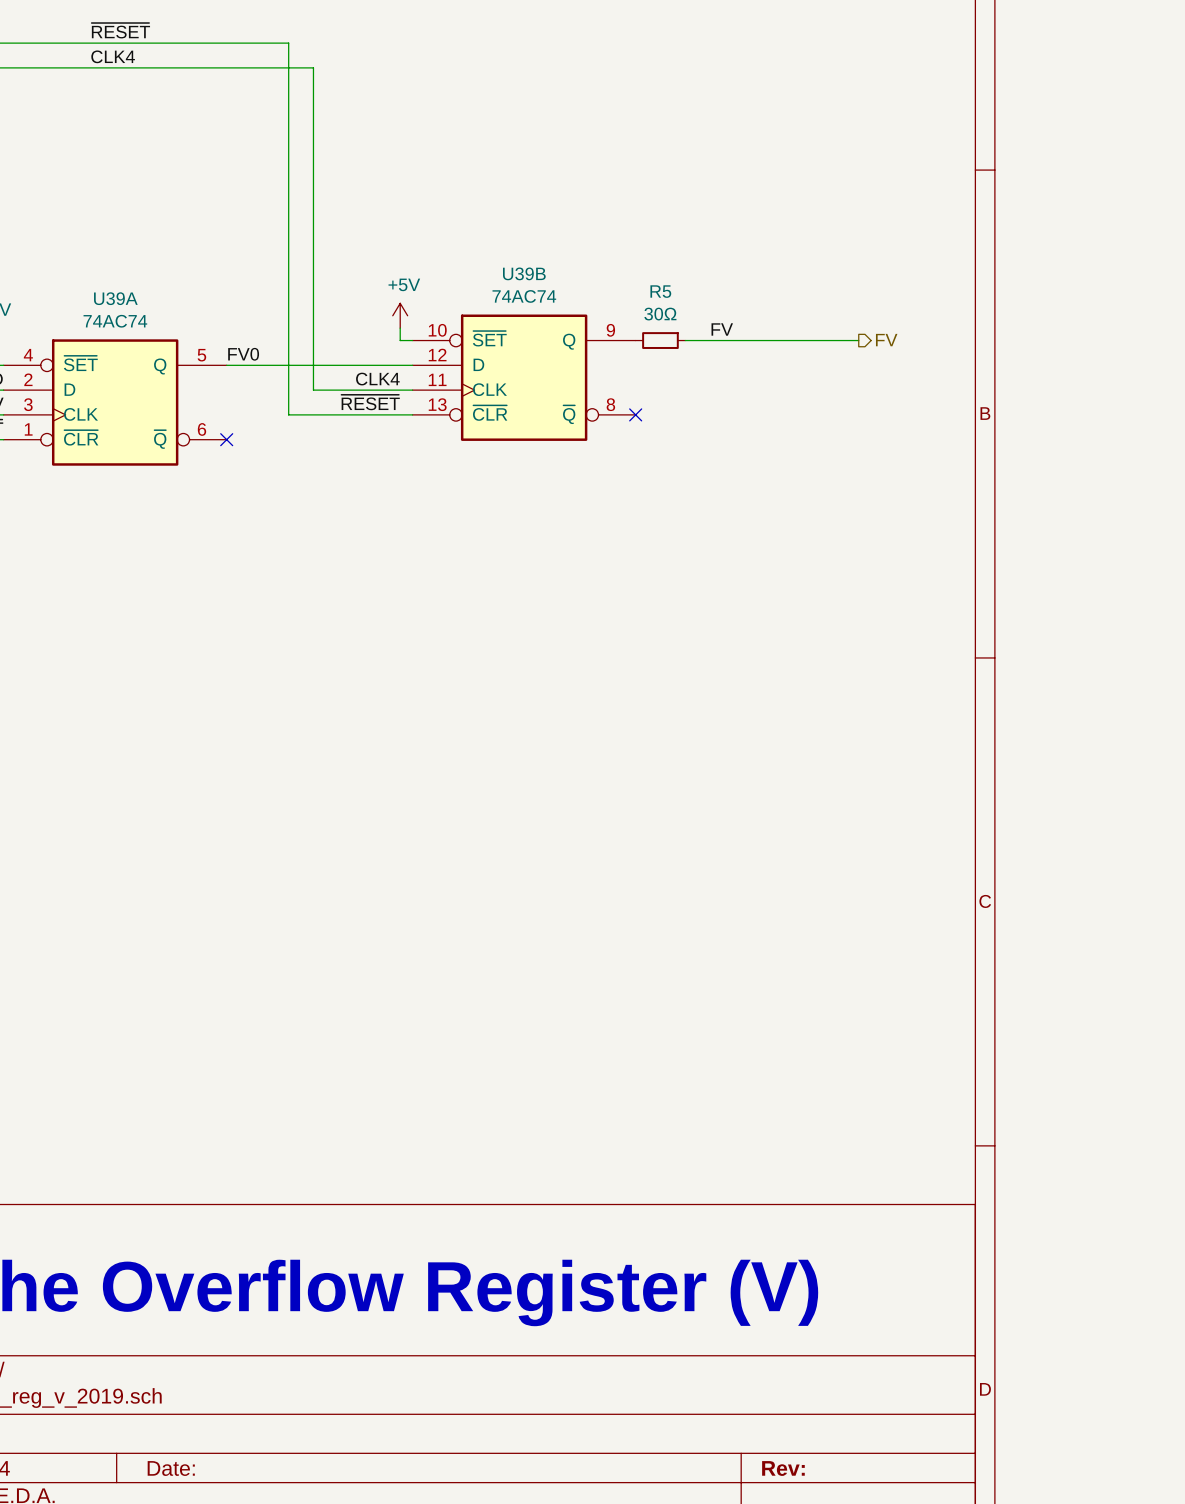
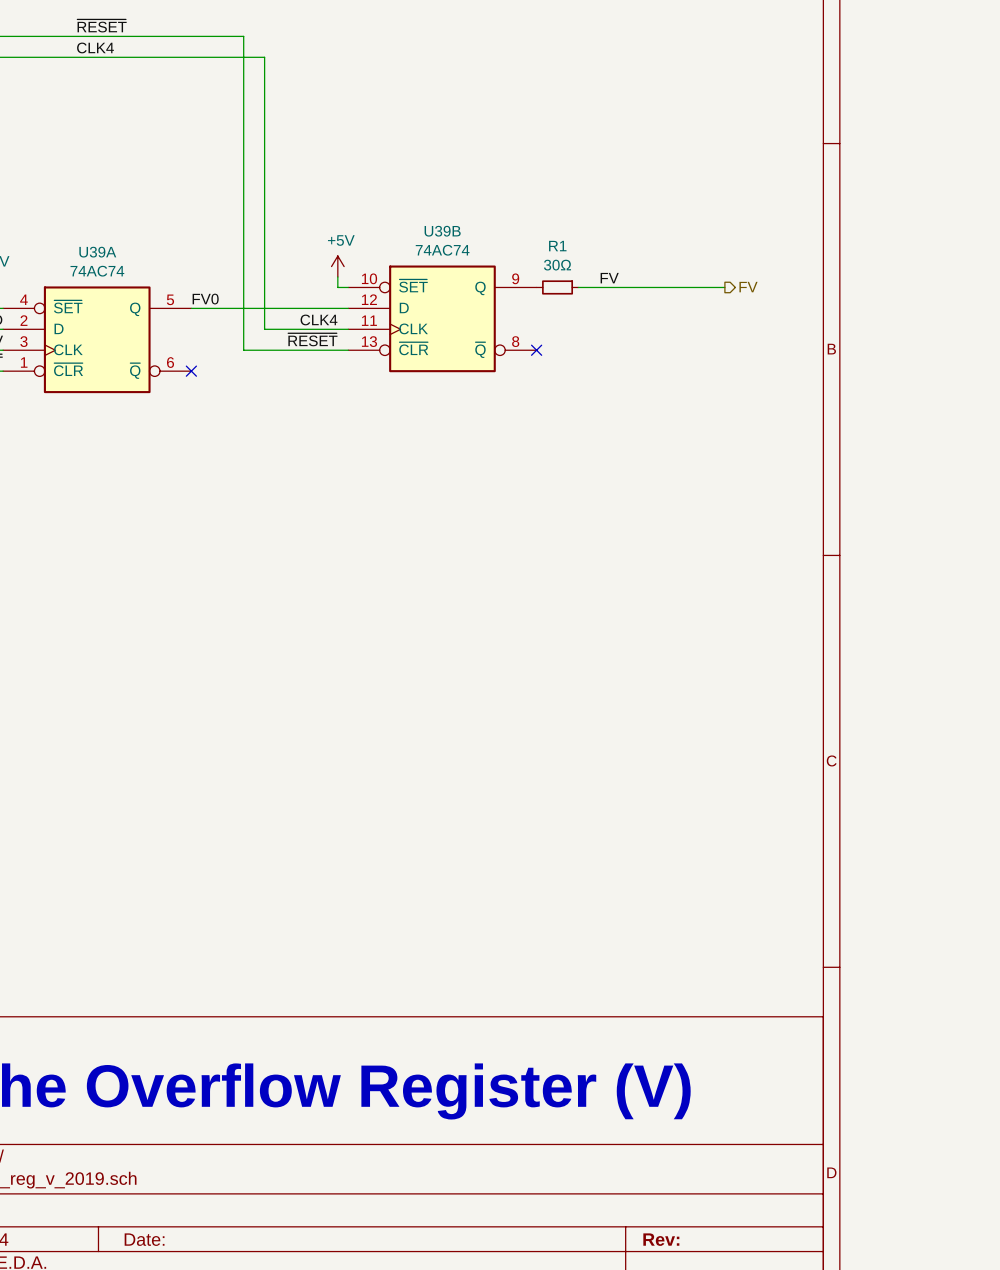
R5 name: R5 (660, 291) -> R1 (557, 246)

